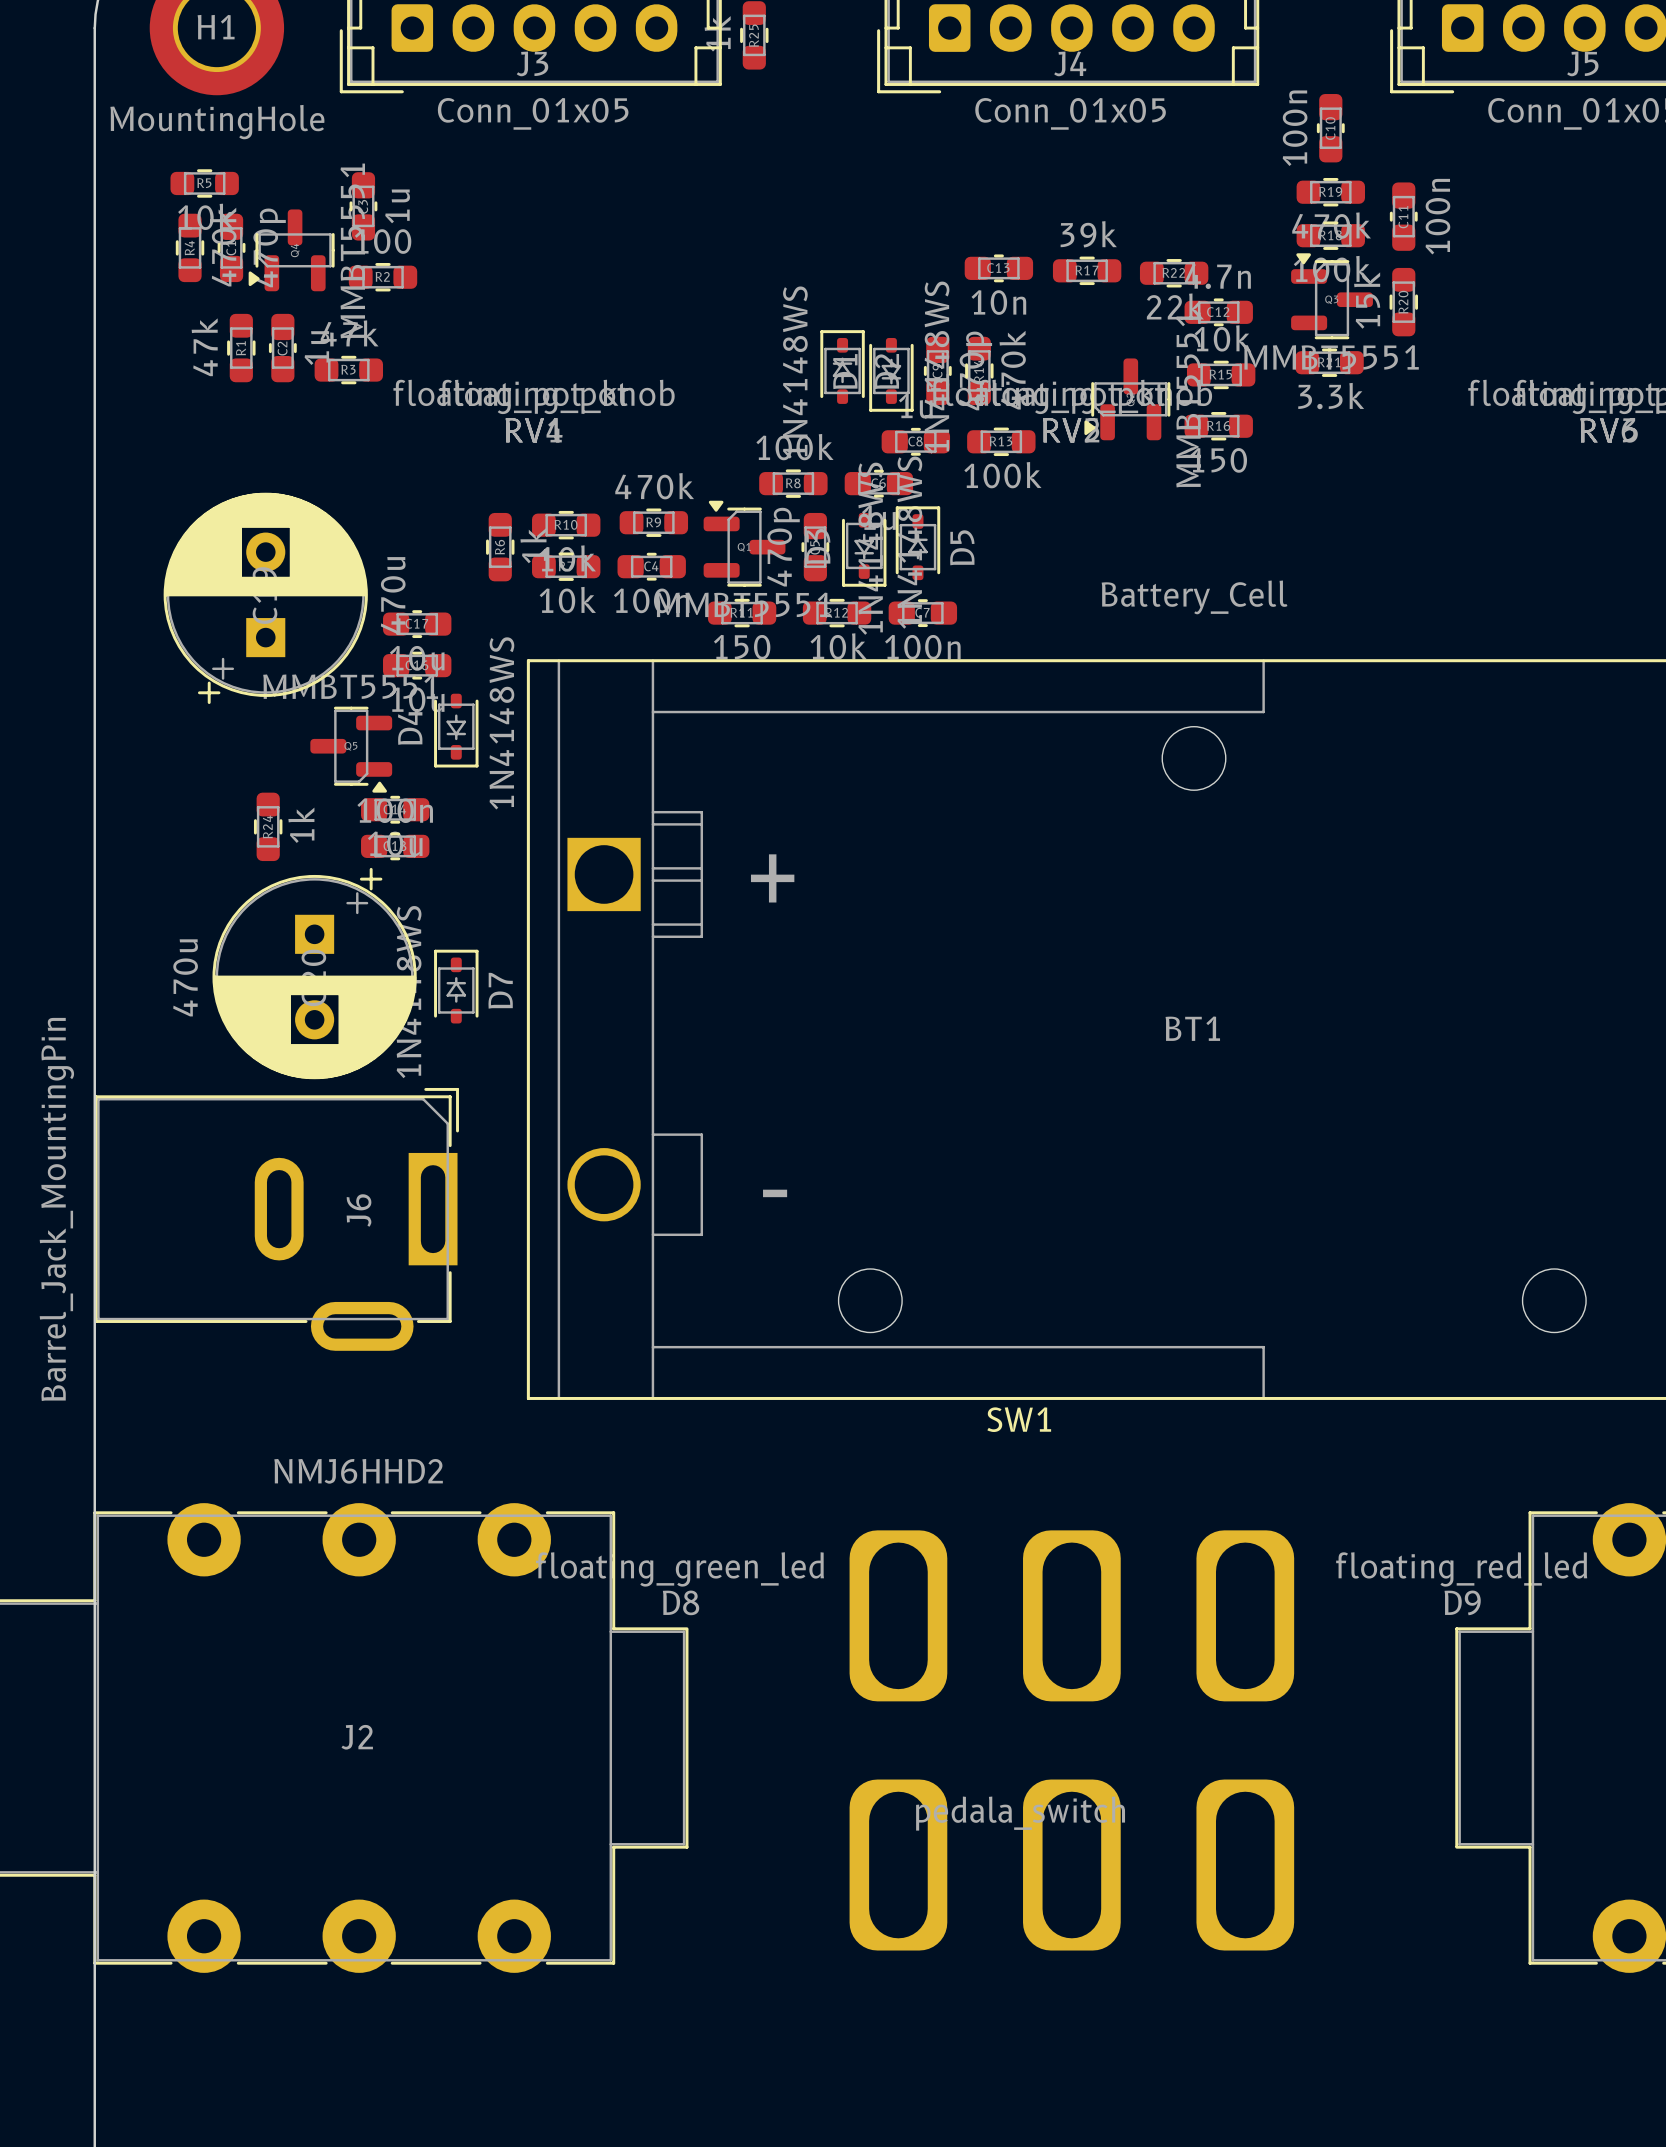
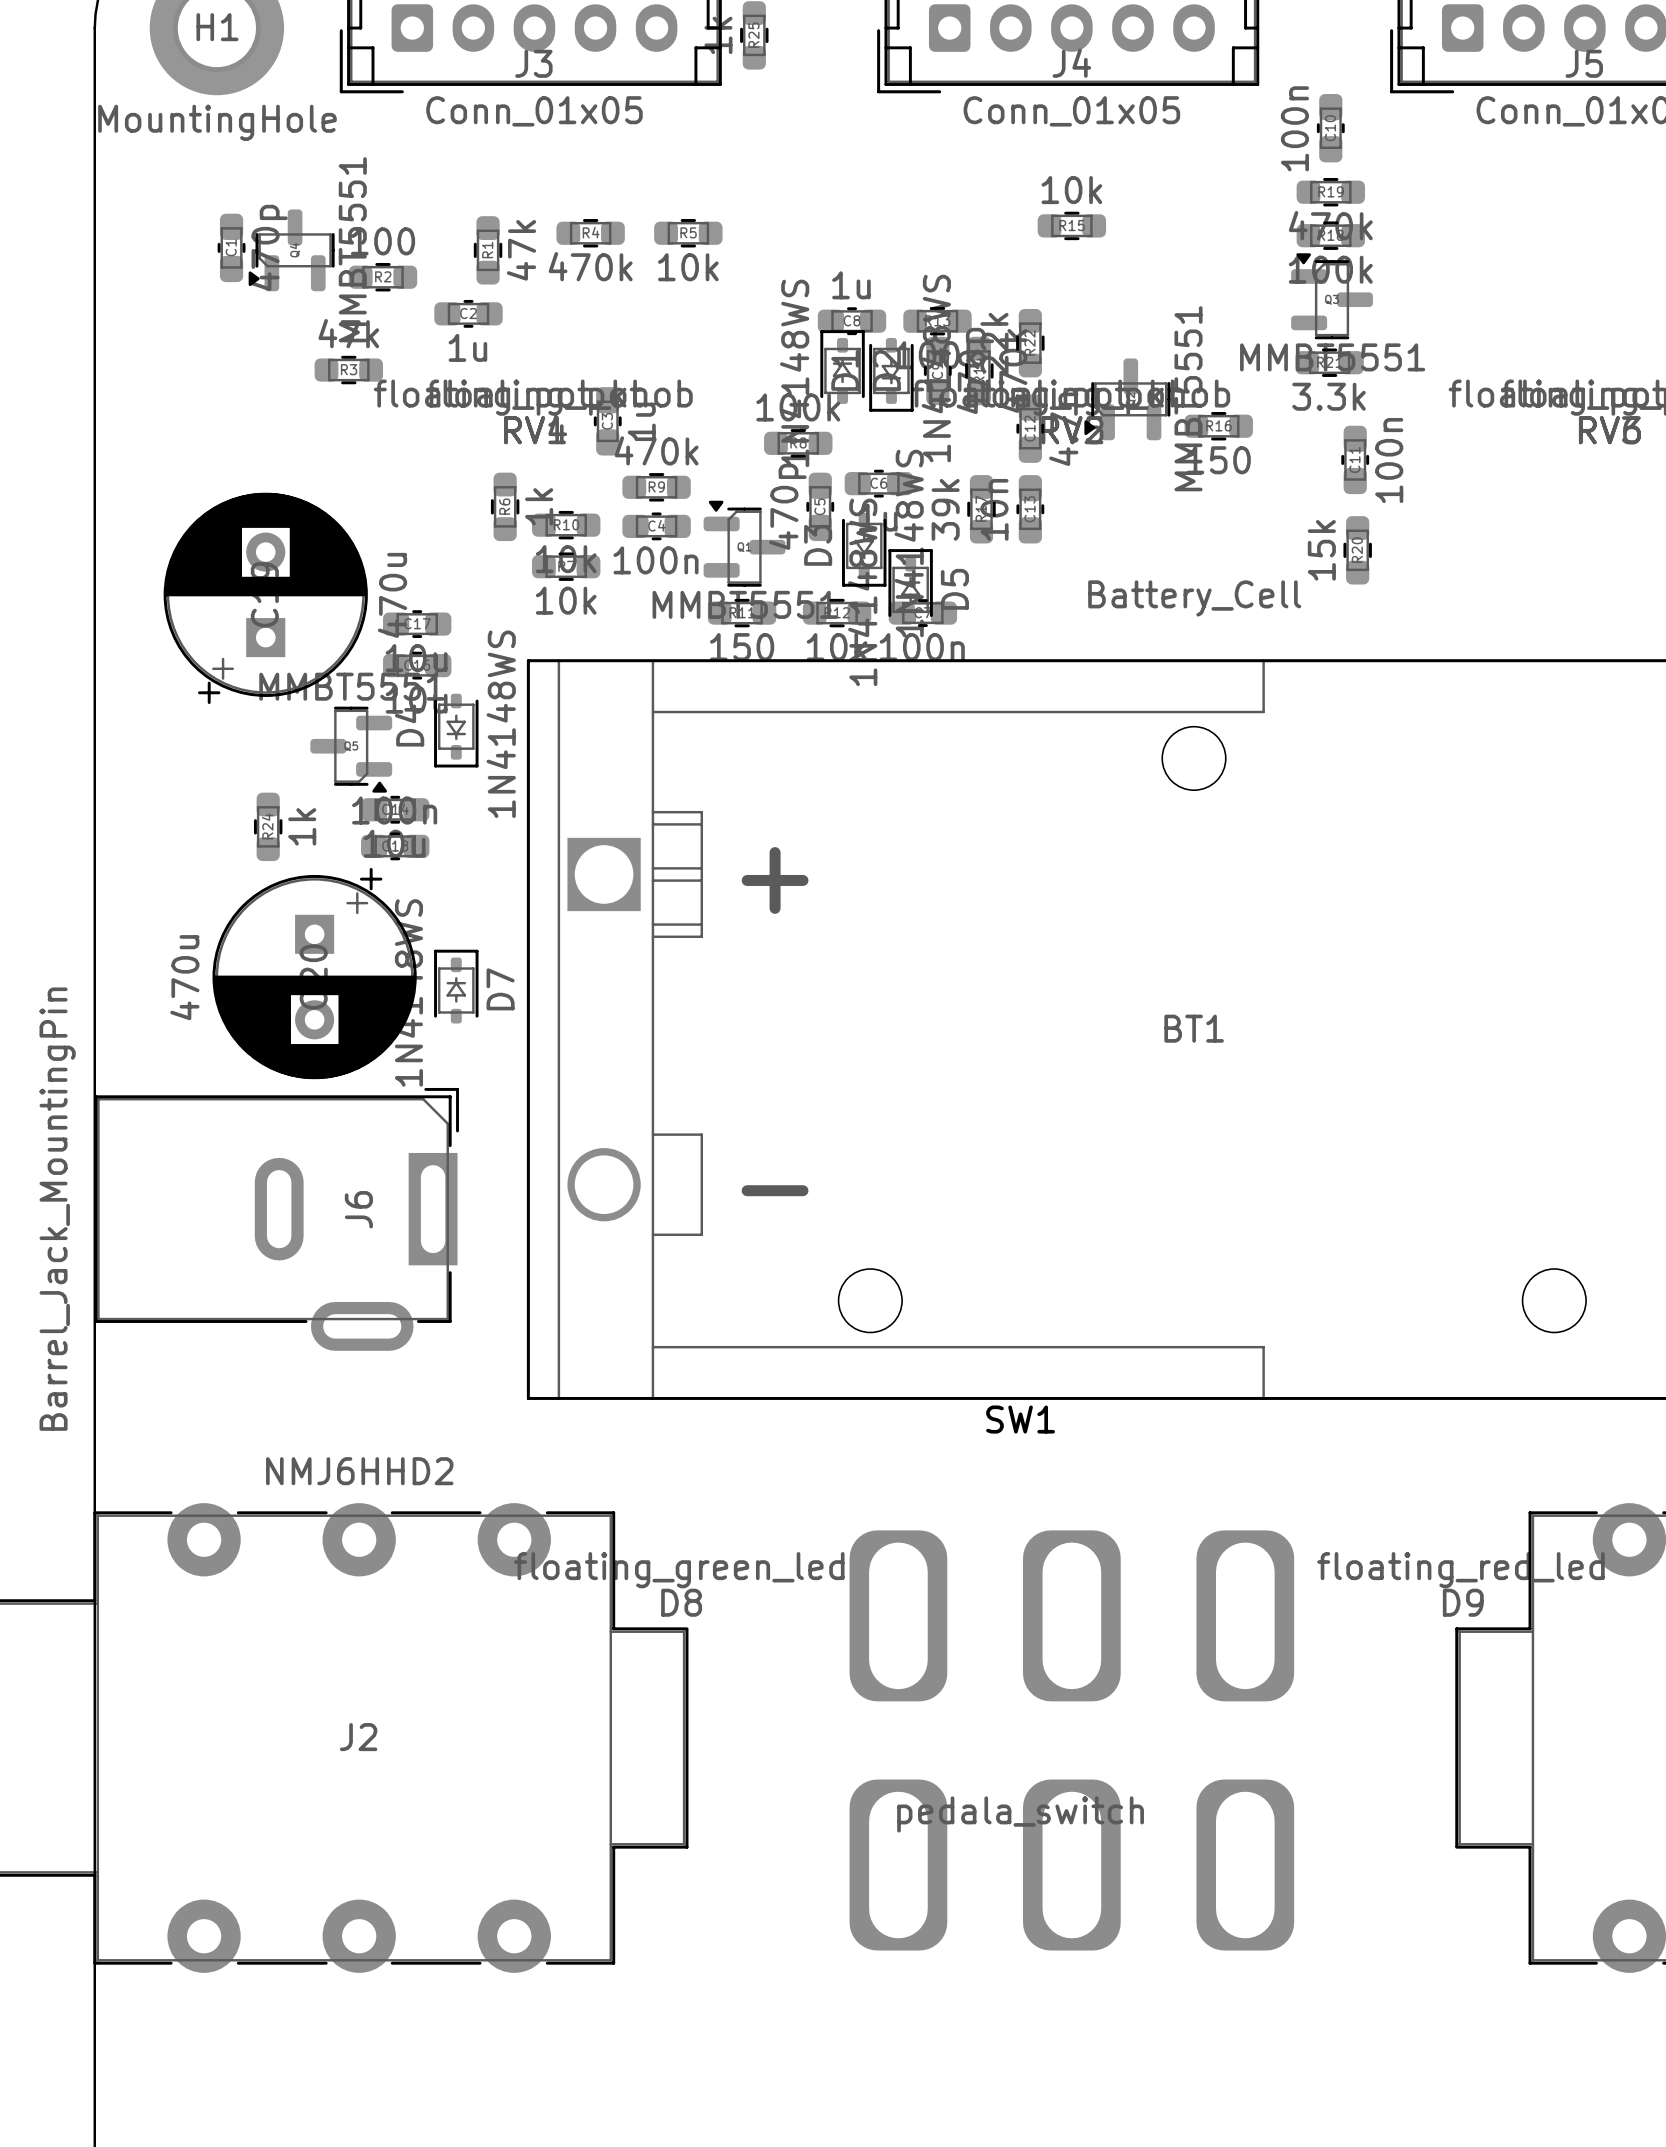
R5 position: (204, 183) -> (688, 233)
C3 position: (363, 206) -> (607, 421)
C11 position: (1403, 216) -> (1355, 459)
R17 value position: 39k (1088, 234) -> 39k (945, 509)
R4 rotation: 0° (190, 247) -> 90° clockwise (590, 233)
R4 position: (190, 247) -> (590, 233)
C13 rotation: 0° (998, 268) -> 90° clockwise (1030, 509)
C13 position: (998, 268) -> (1030, 509)
R17 rotation: 0° (1087, 270) -> 90° clockwise (981, 509)
R17 position: (1087, 270) -> (981, 509)
R22 rotation: 0° (1174, 273) -> 90° clockwise (1030, 343)
R22 position: (1174, 273) -> (1030, 343)
R20 position: (1403, 302) -> (1357, 550)
C12 rotation: 0° (1218, 312) -> 90° clockwise (1030, 428)
C12 position: (1218, 312) -> (1030, 428)
R1 value position: 47k (204, 347) -> 47k (521, 250)
R1 position: (241, 348) -> (488, 250)
C2 rotation: 0° (282, 348) -> 90° clockwise (468, 313)
C2 position: (282, 348) -> (468, 313)
R15 position: (1221, 374) -> (1071, 225)
C8 position: (915, 441) -> (852, 321)
R13 position: (1001, 441) -> (937, 321)
R8 position: (793, 483) -> (798, 443)
R9 position: (653, 522) -> (656, 487)
D5 position: (917, 543) -> (910, 585)
R6 position: (500, 547) -> (505, 506)
C5 position: (815, 547) -> (820, 506)
C4 position: (651, 566) -> (656, 526)

